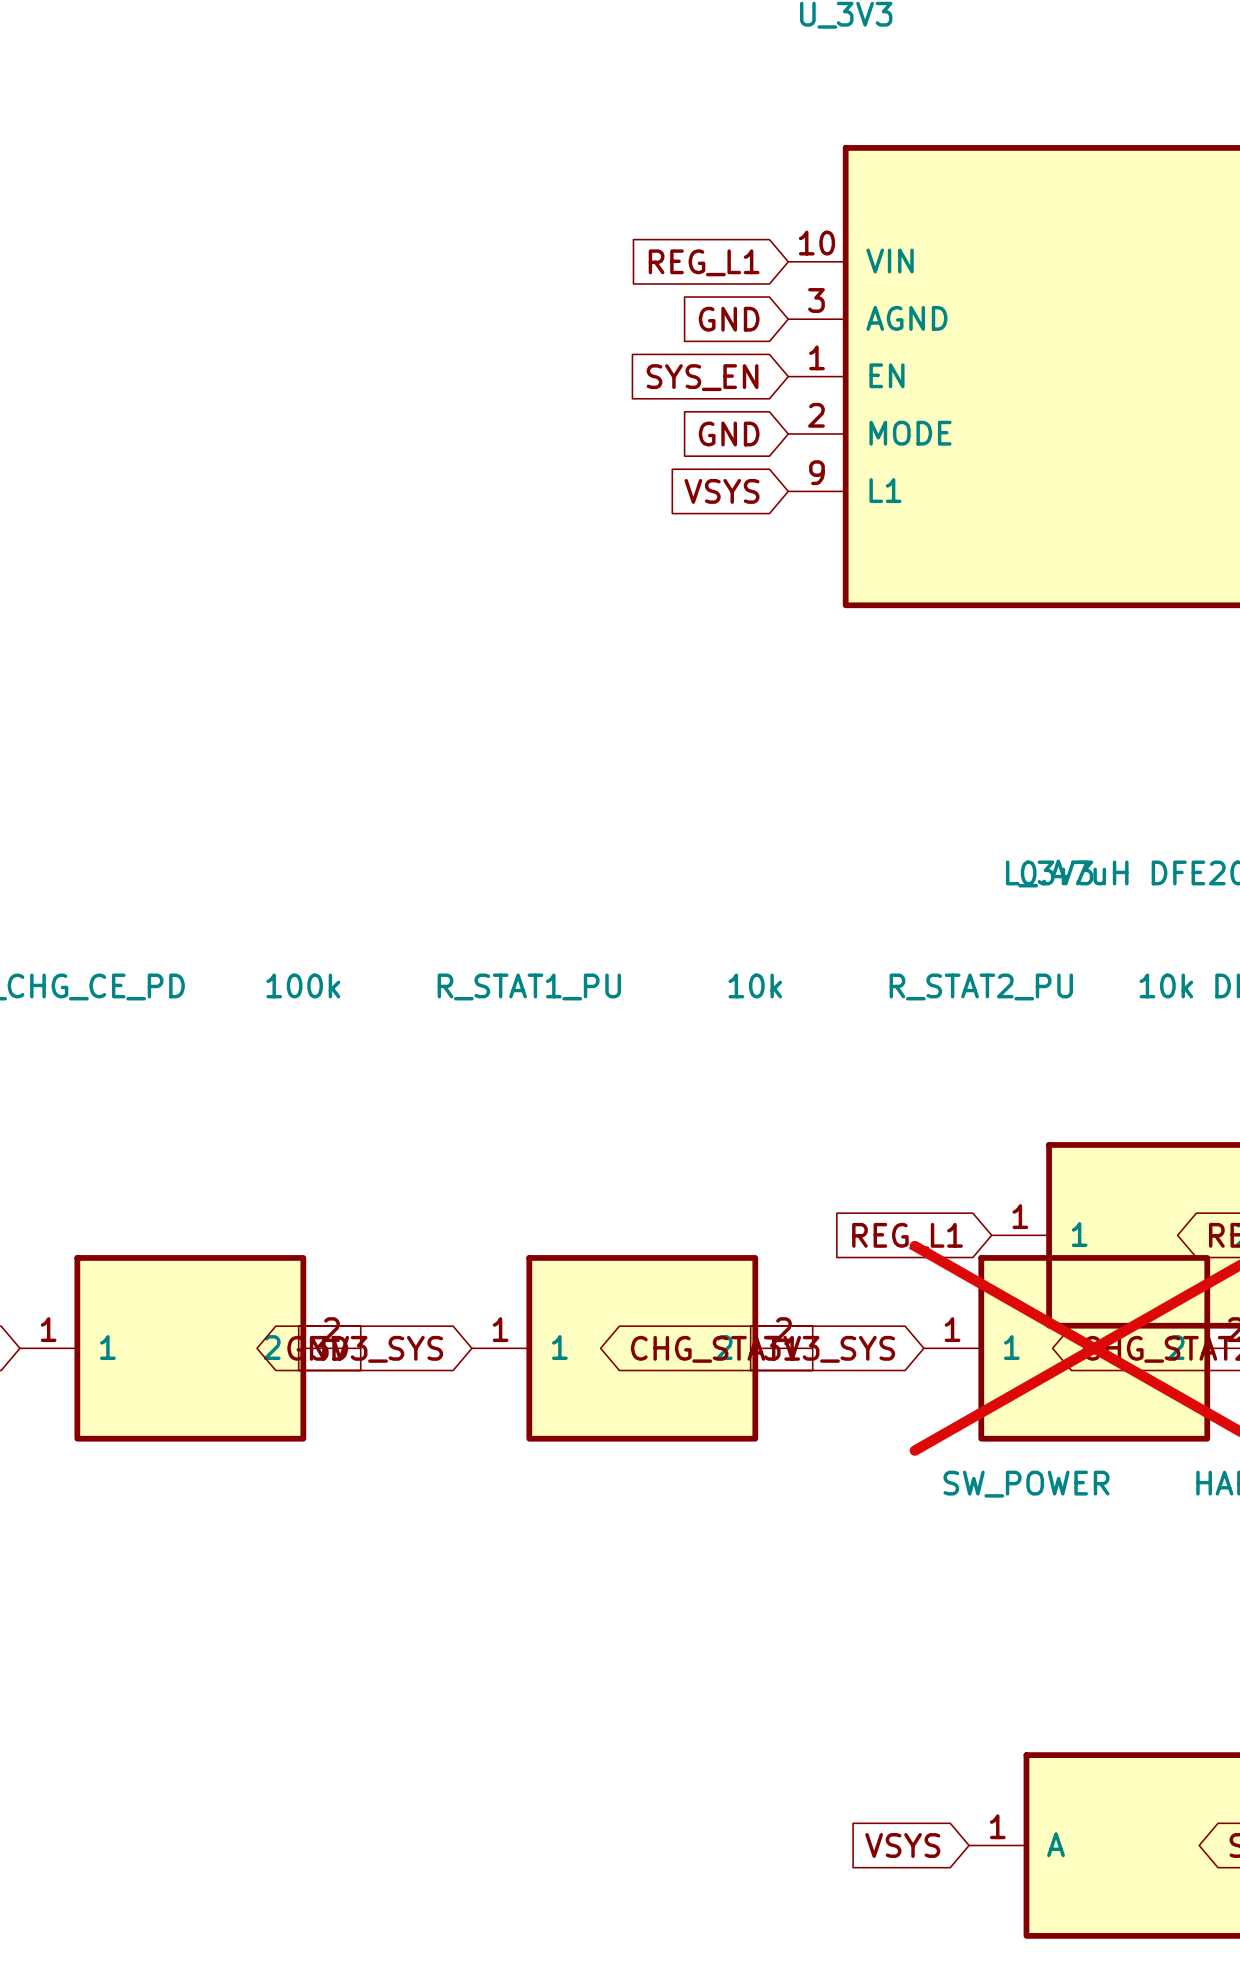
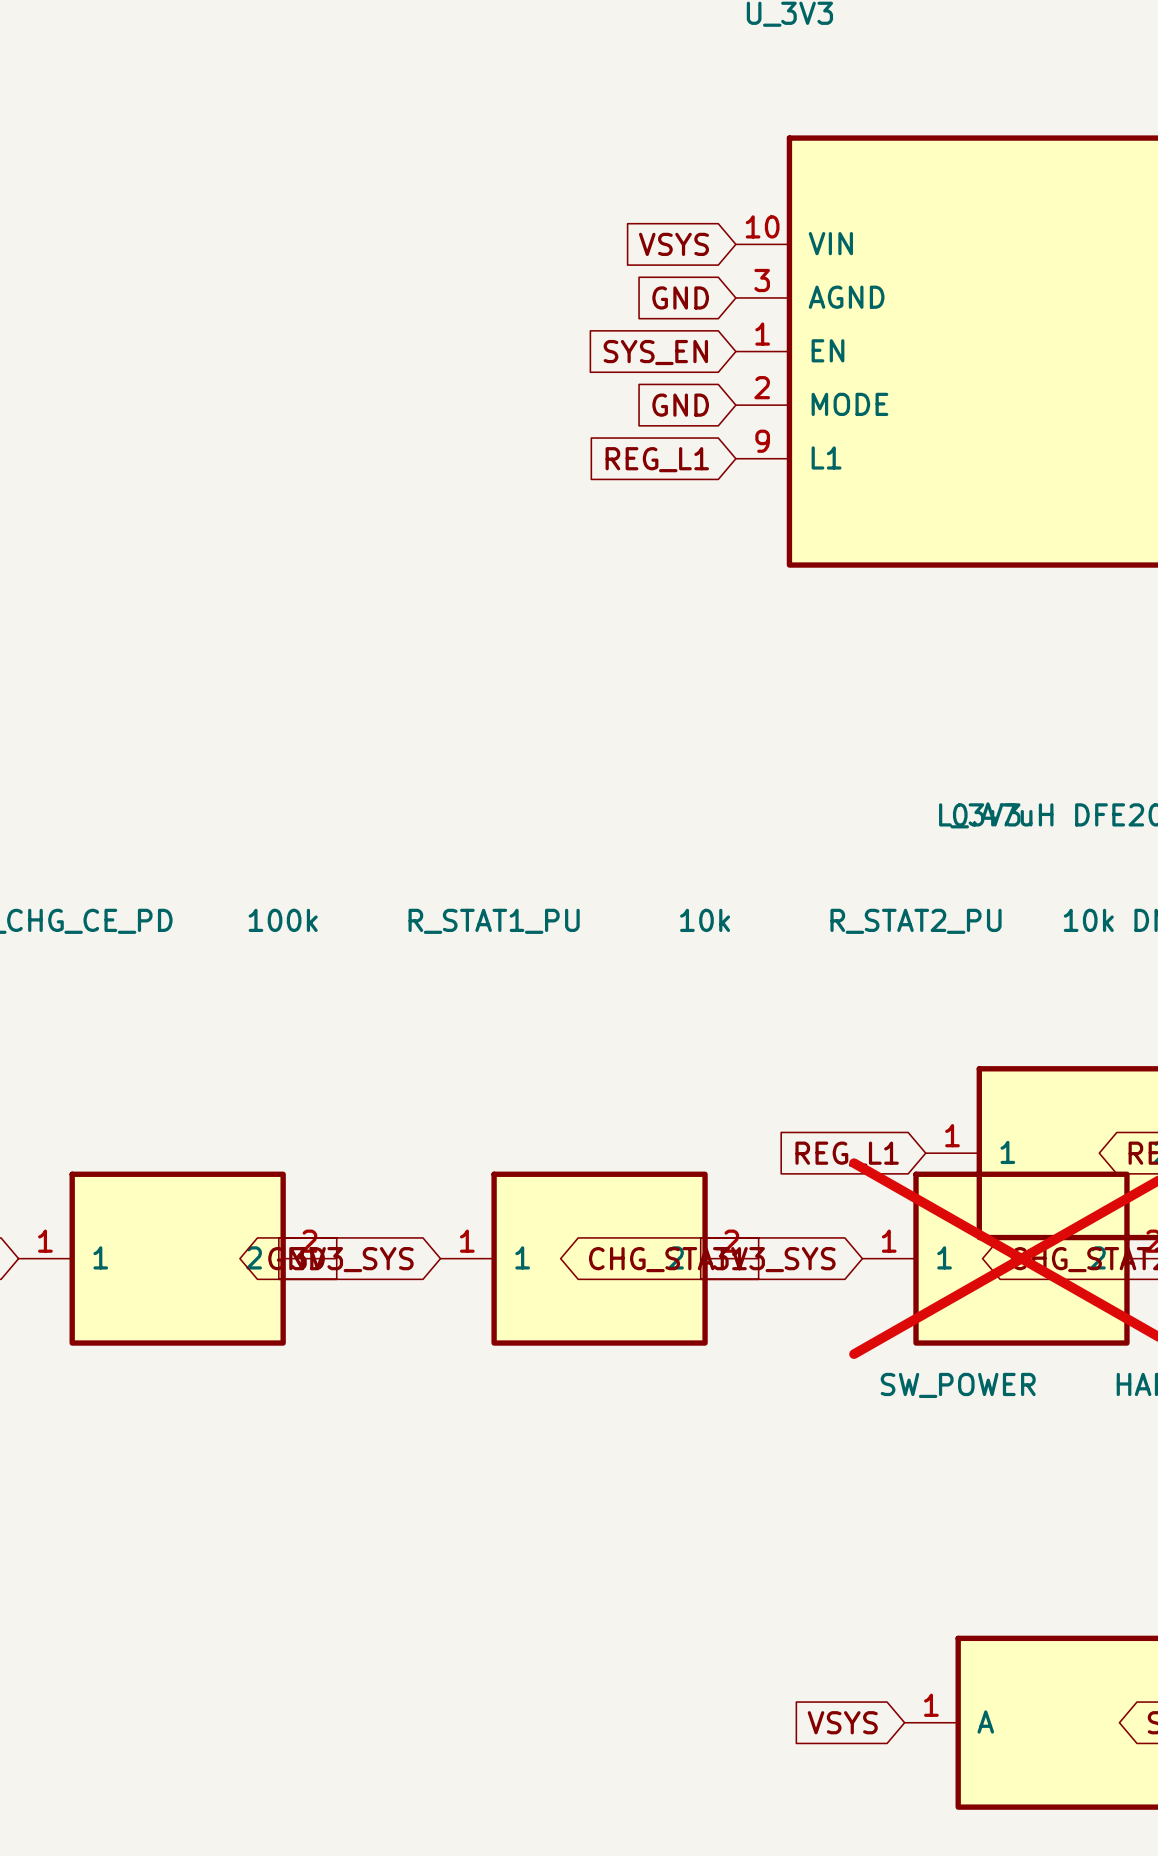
global label: REG_L1 (704, 262) -> VSYS (673, 244)
global label: VSYS (722, 491) -> REG_L1 (657, 459)

